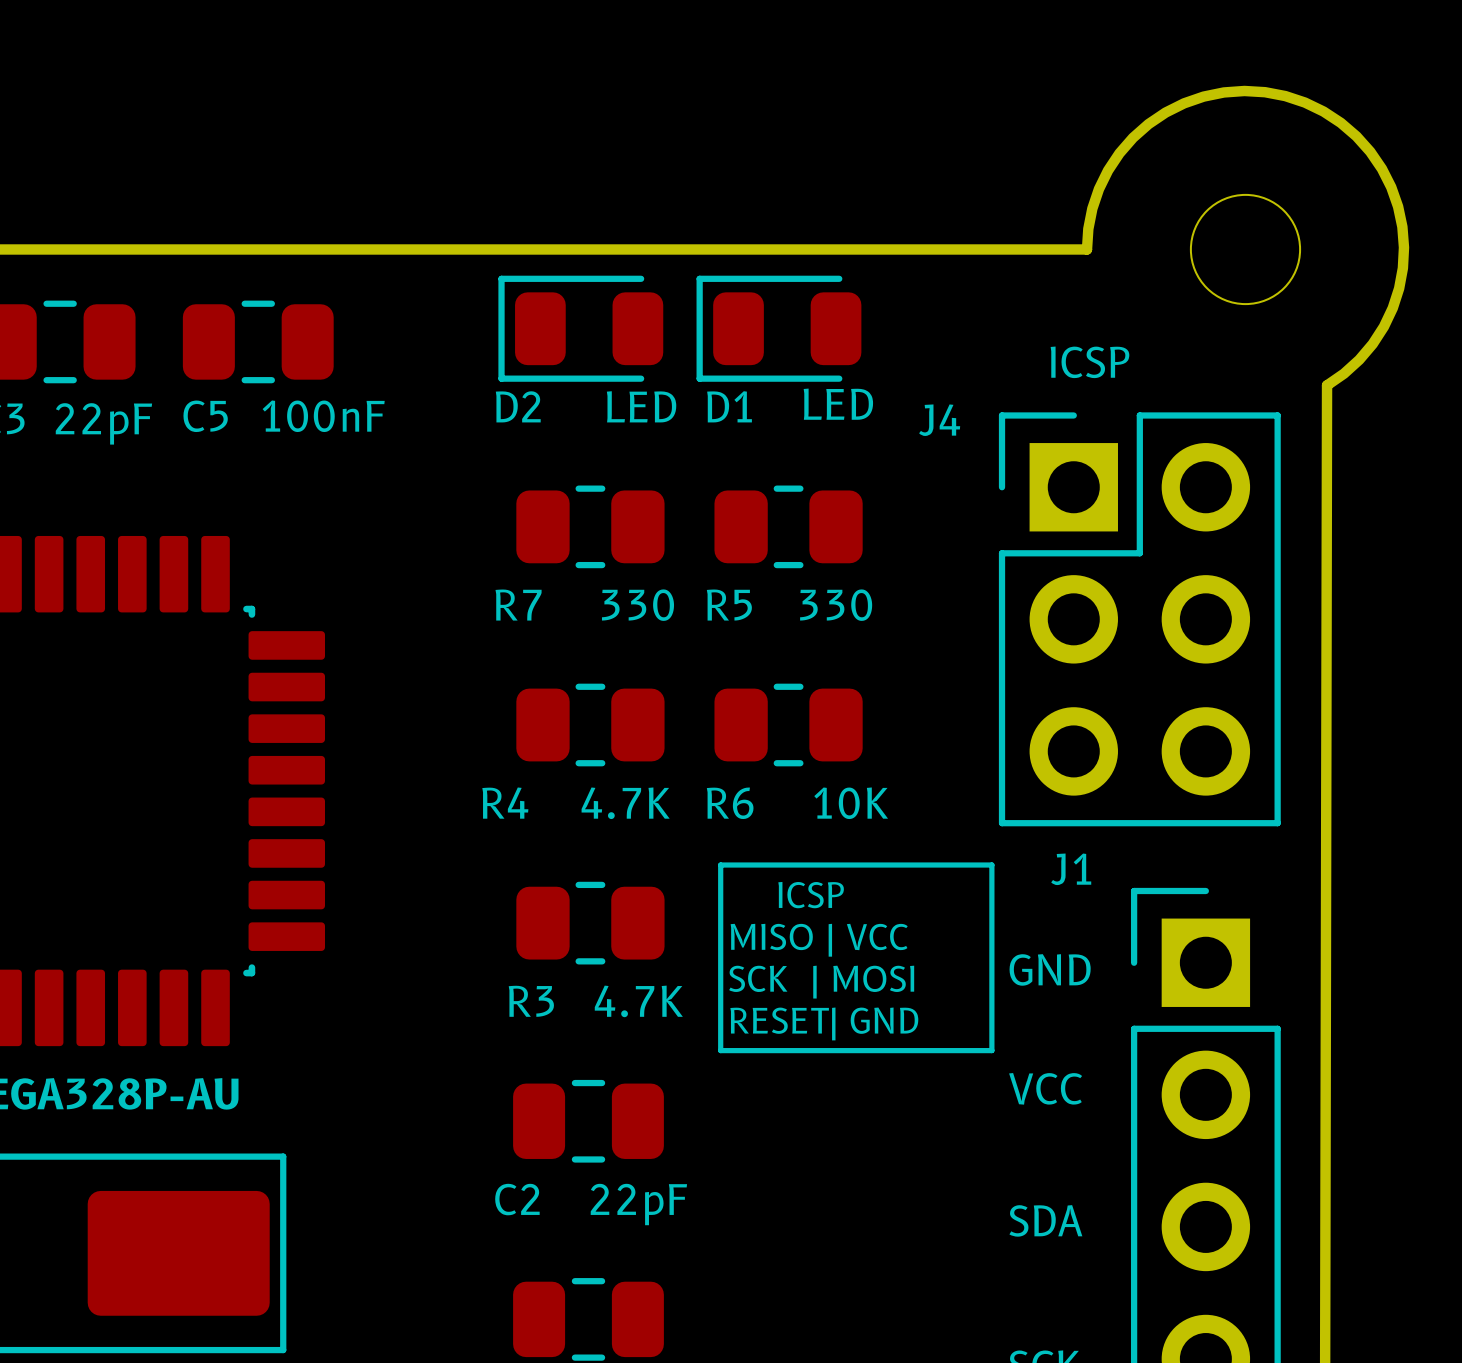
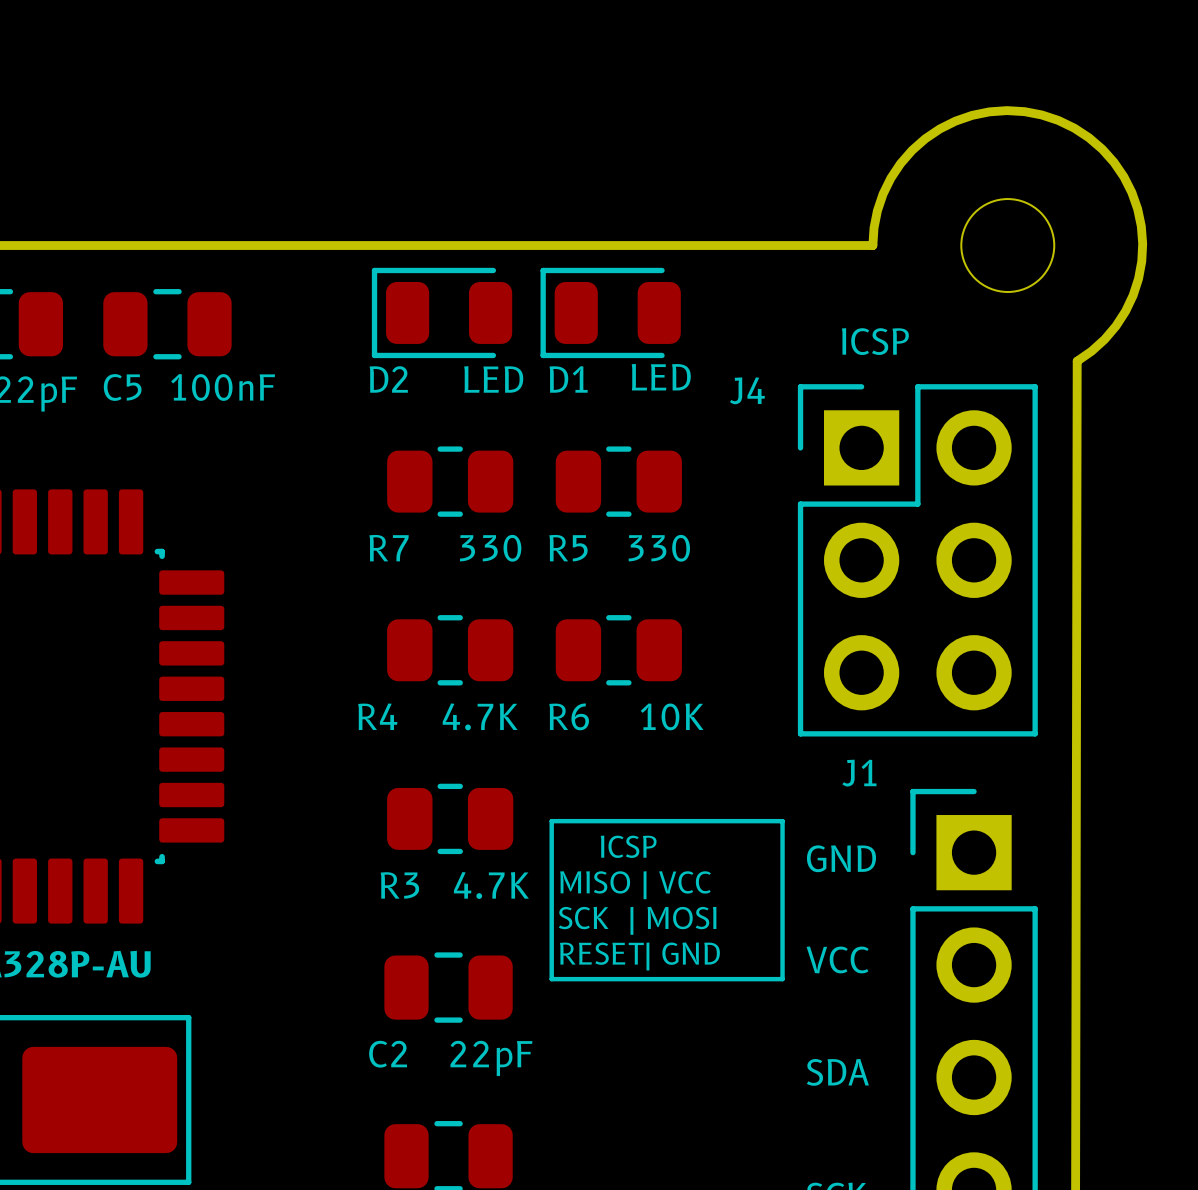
line: (720, 865) (991, 865) (991, 1050) (720, 1050) (720, 865) -> (551, 821) (782, 821) (782, 979) (551, 979) (551, 821)
text position: ICSP (811, 895) -> ICSP (628, 846)
text position: MISO | VCC (819, 940) -> MISO | VCC (635, 885)
text position: SCK | MOSI (821, 982) -> SCK | MOSI (637, 920)
text position: RESET| GND (824, 1023) -> RESET| GND (639, 956)

